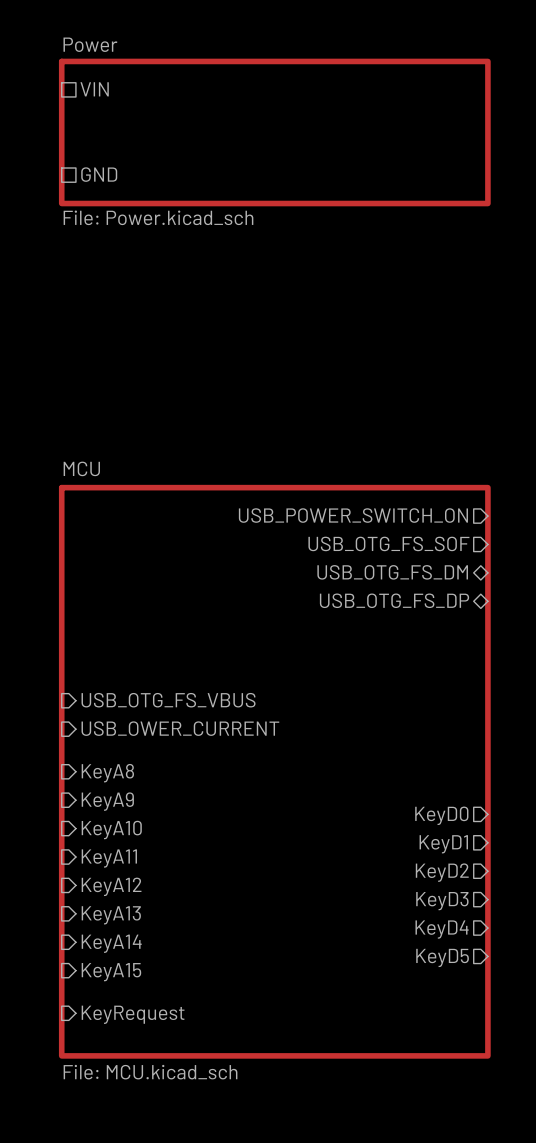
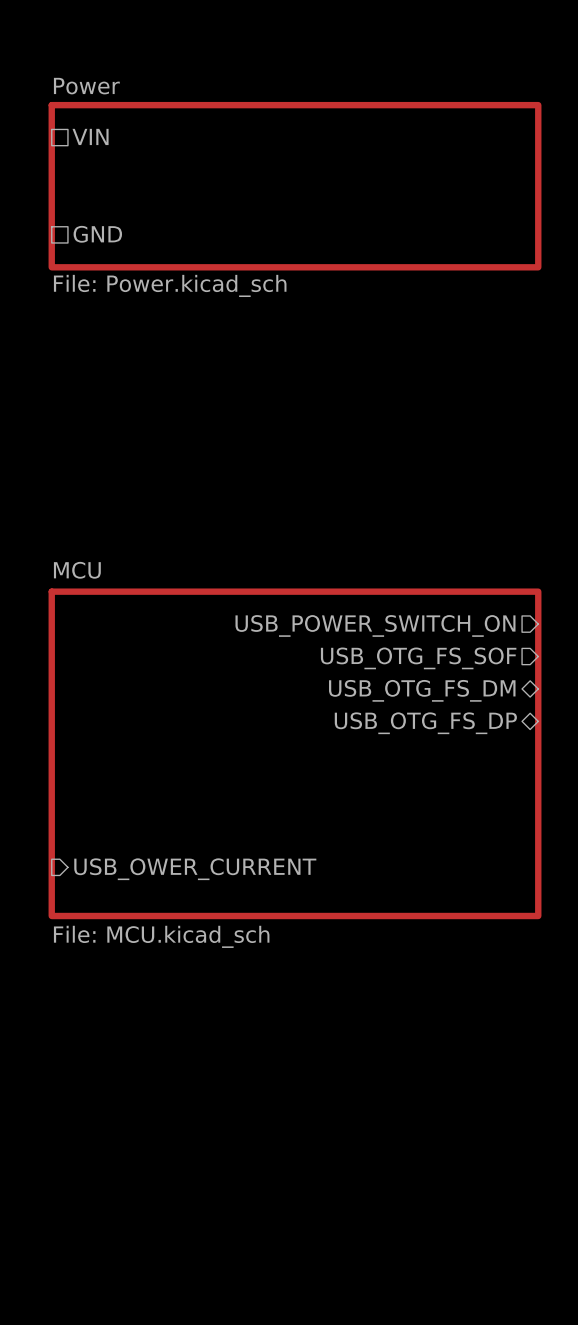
sheet MCU: none -> File: MCU.kicad_sch (295, 753)
sheet pin: USB_OTG_FS_VBUS (168, 700) -> none
sheet MCU: File: MCU.kicad_sch (274, 771) -> none
sheet pin: KeyA8 (107, 773) -> none
sheet pin: KeyA9 (107, 801) -> none
sheet pin: KeyD0 (441, 815) -> none
sheet pin: KeyA10 (111, 830) -> none
sheet pin: KeyD1 (443, 844) -> none
sheet pin: KeyA11 (109, 858) -> none
sheet pin: KeyD2 (442, 872) -> none
sheet pin: KeyA12 (111, 886) -> none
sheet pin: KeyD3 (442, 901) -> none
sheet pin: KeyA13 (111, 915) -> none
sheet pin: KeyD4 (442, 929) -> none
sheet pin: KeyA14 (111, 943) -> none
sheet pin: KeyD5 (442, 957) -> none
sheet pin: KeyA15 (111, 972) -> none
sheet pin: KeyRequest (133, 1014) -> none

